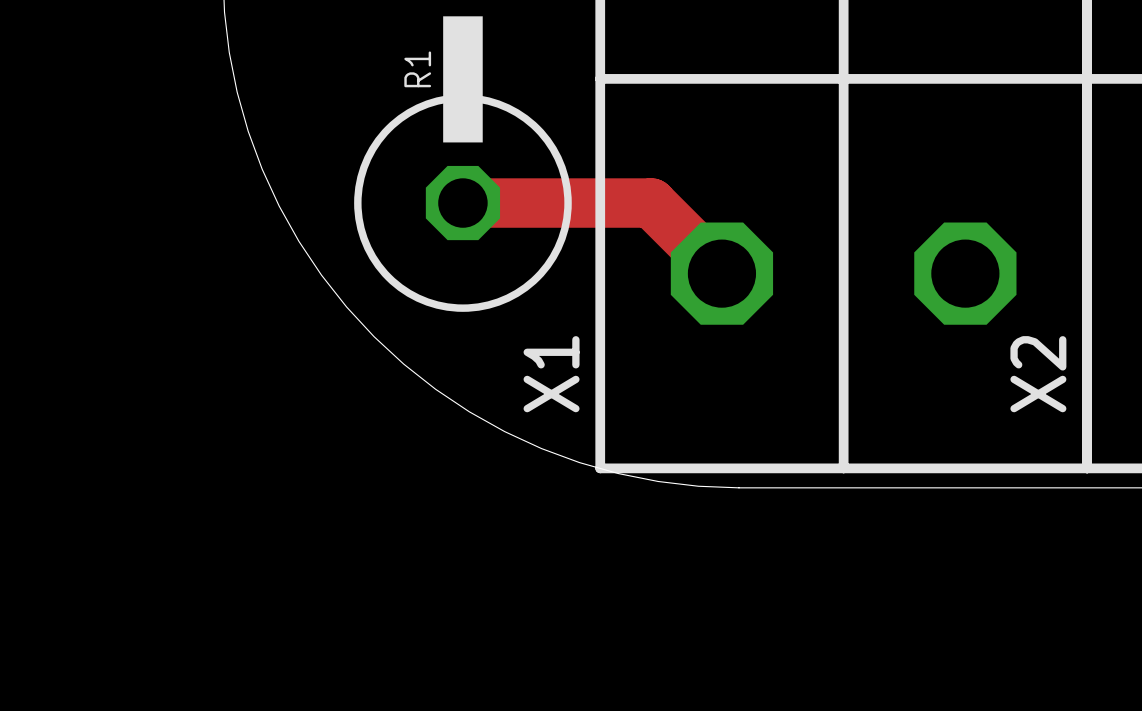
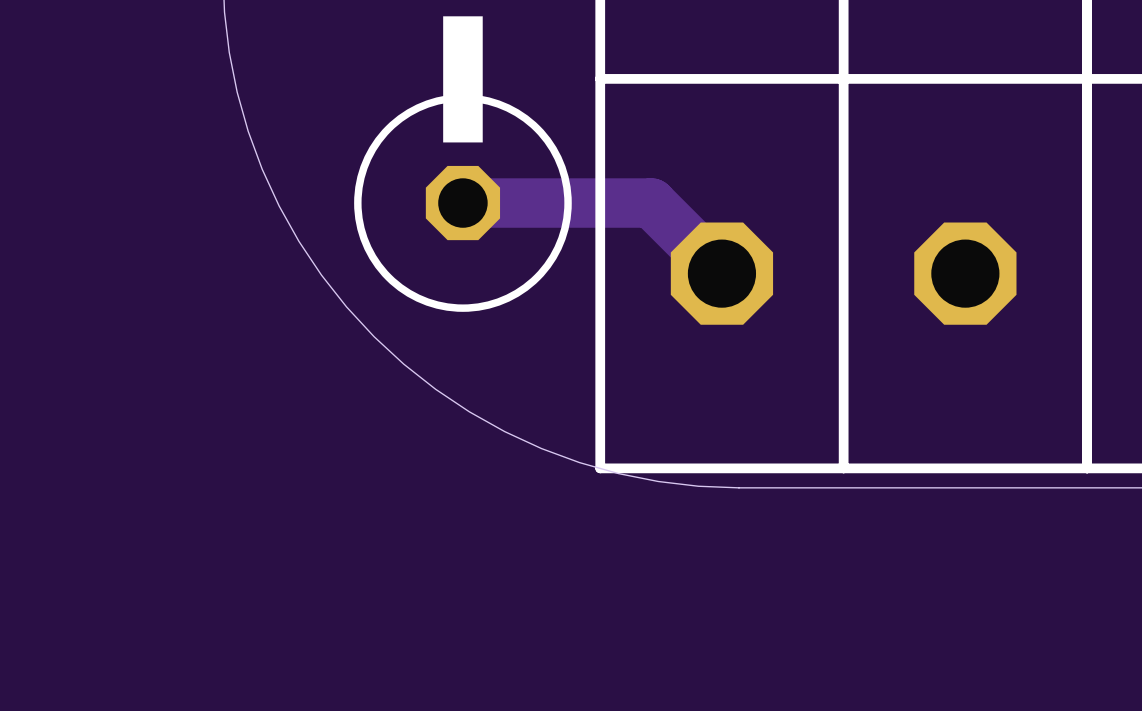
R1 name: R1 (417, 69) -> none
X1 name: X1 (551, 374) -> none
X2 name: X2 (1038, 374) -> none

